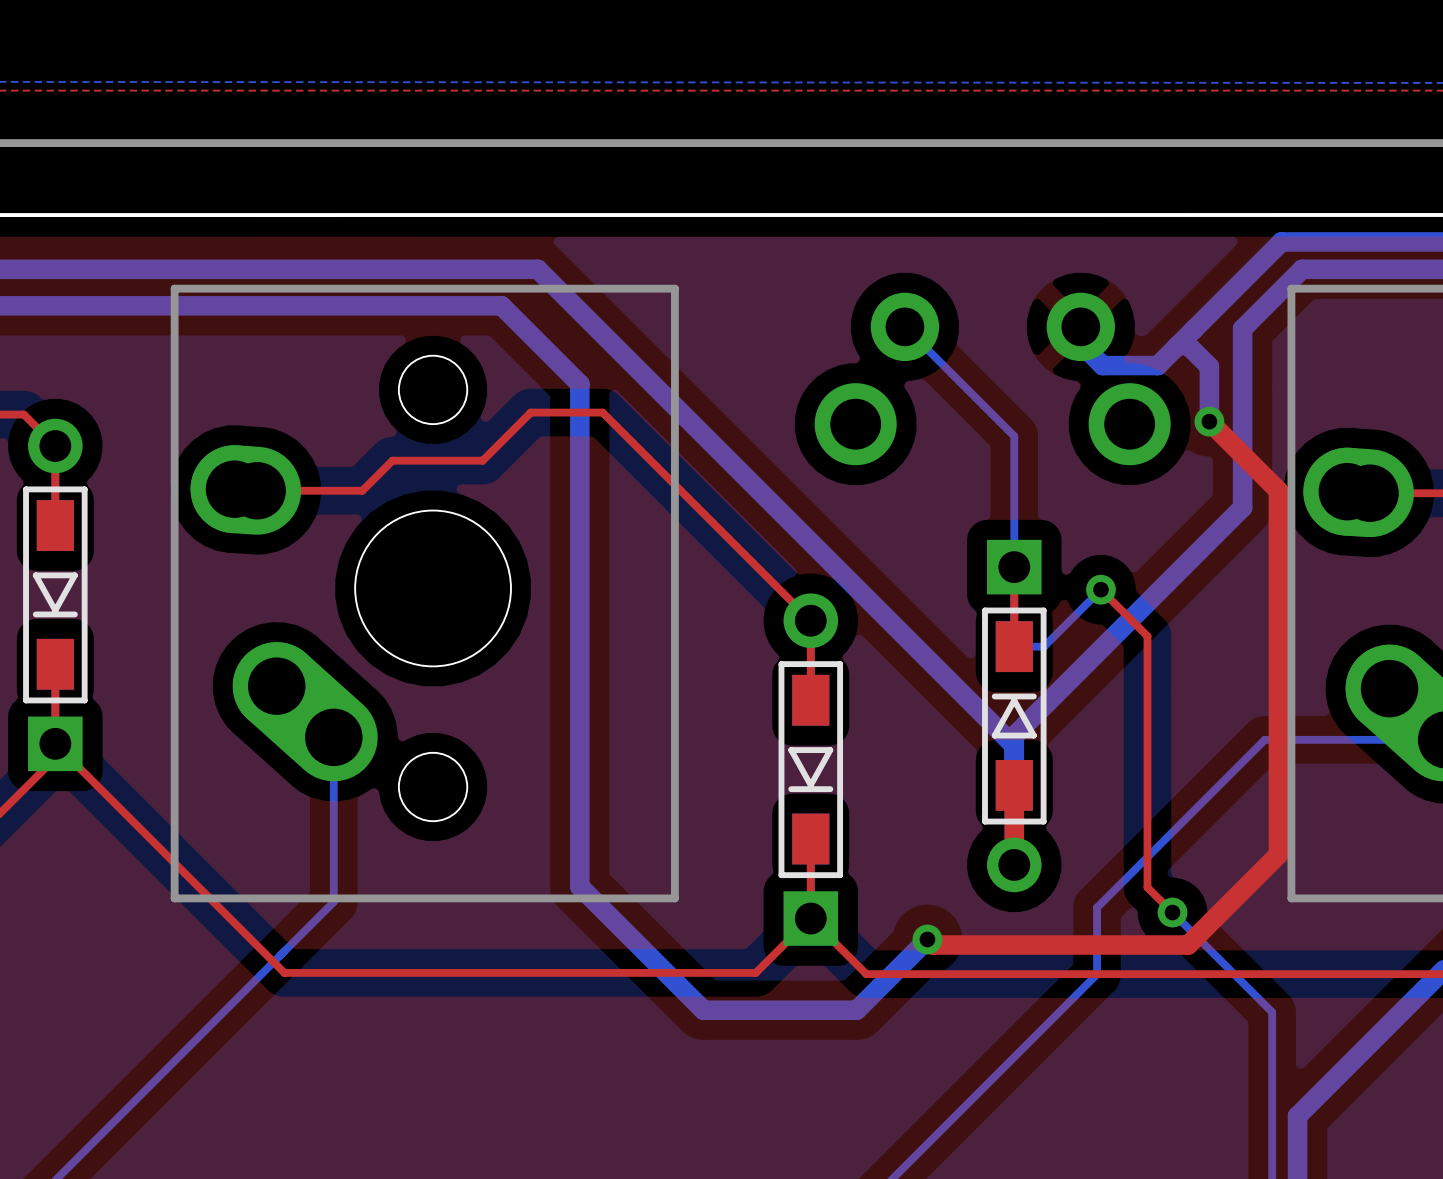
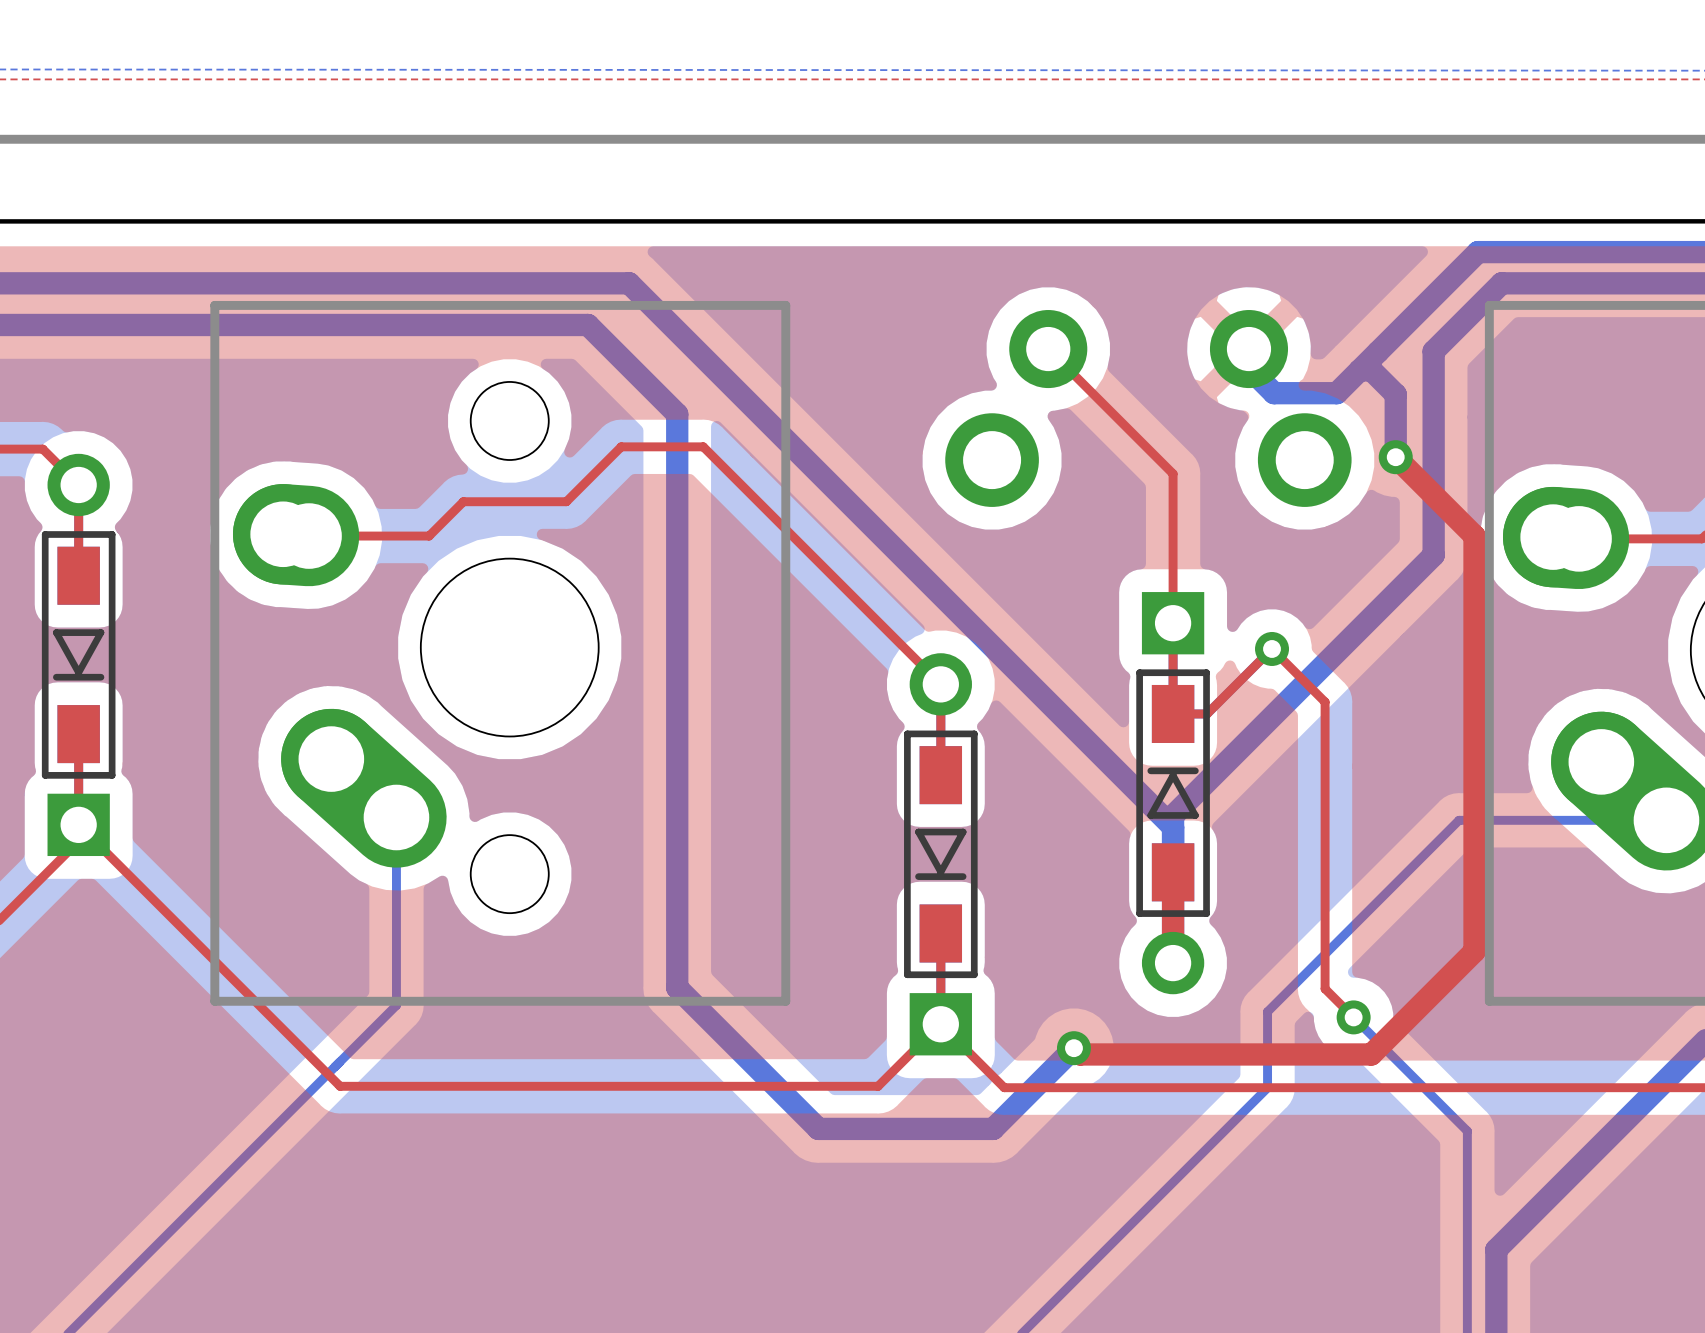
bottom track: (904, 326) (1014, 436) (1014, 567) -> none
top track: none -> (1048, 349) (1173, 473) (1173, 623)
top track: none -> (1272, 648) (1207, 713) (1173, 713)

